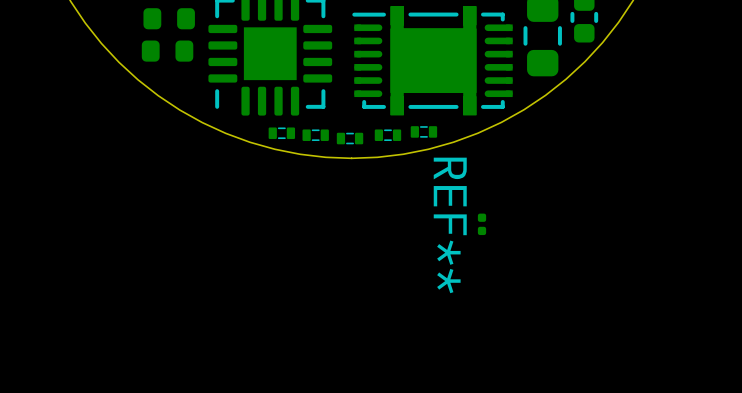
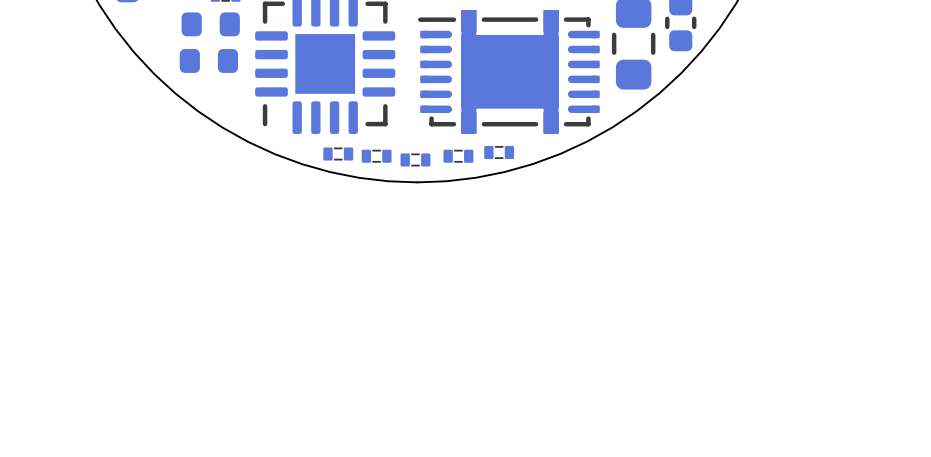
REF**: (482, 224) -> none

